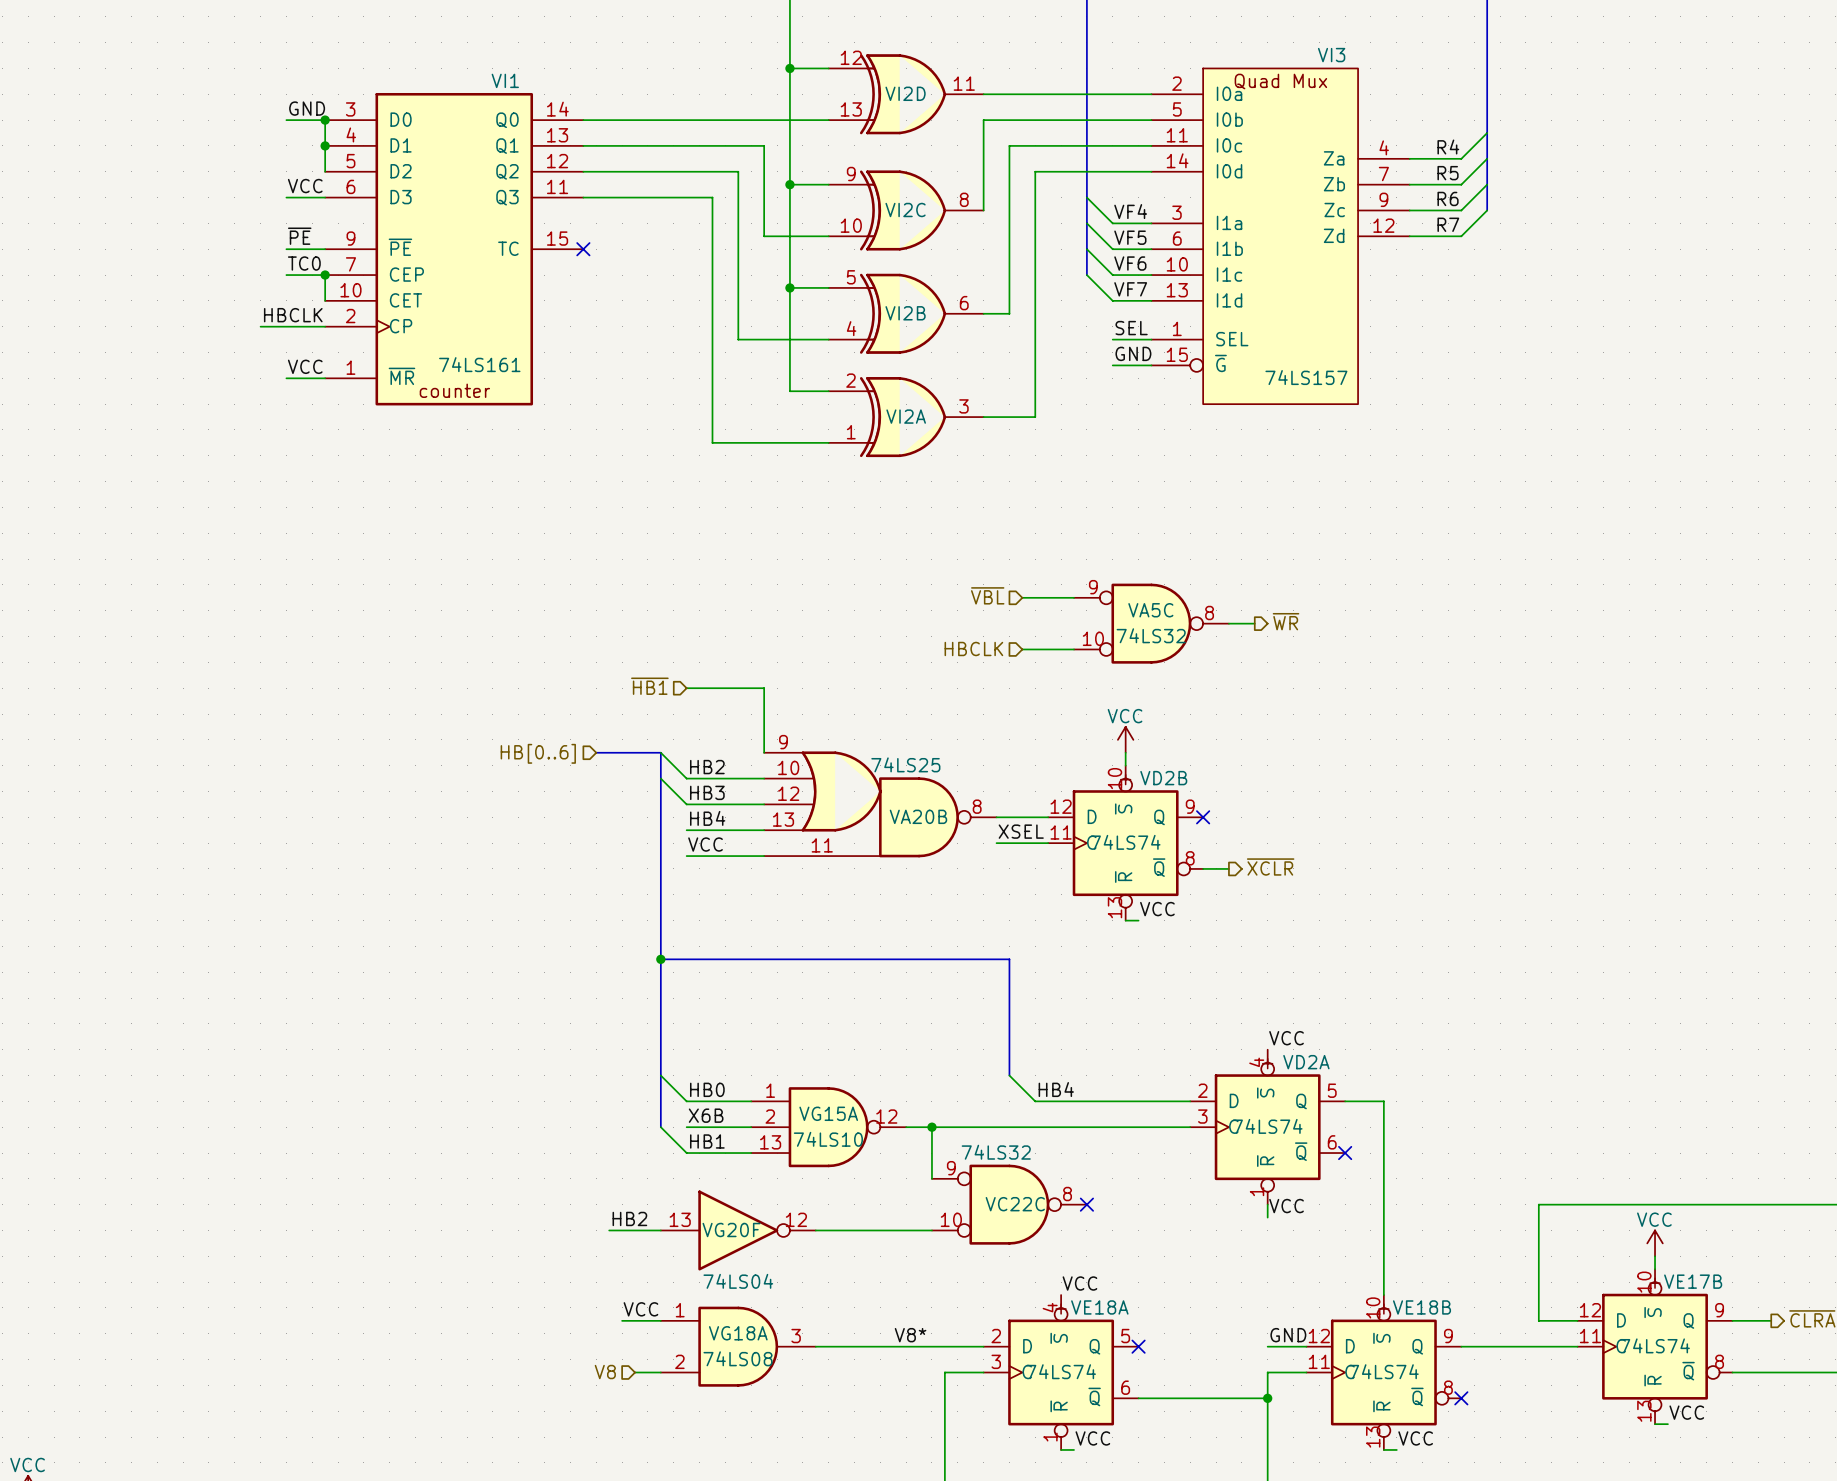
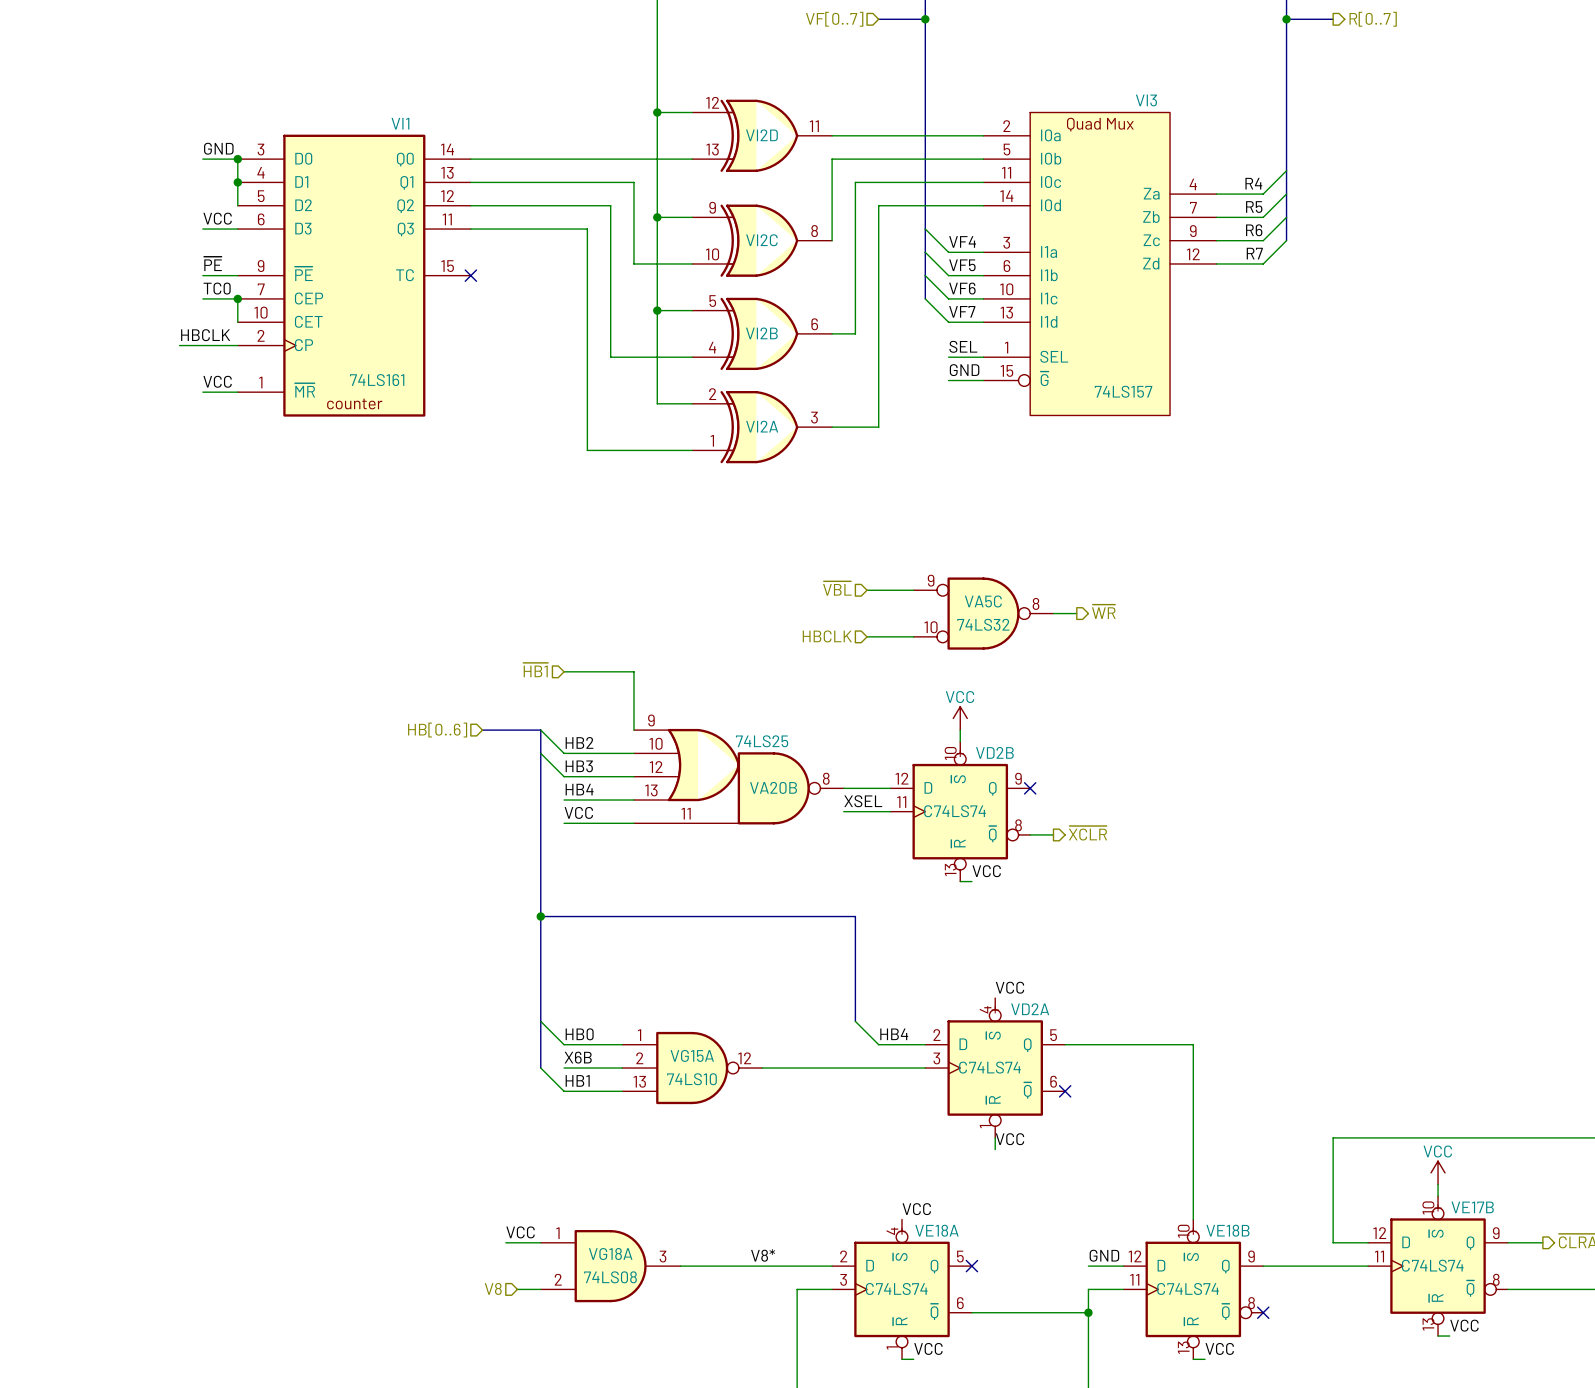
label: none -> VCC (1009, 987)
label: VCC (1286, 1038) -> none
wire: (931, 1127) (931, 1178) -> none
junction: (931, 1127) -> none
VD2A position: (1267, 1127) -> (995, 1068)
no-connect mark: none -> (1065, 1091)
no-connect mark: (1345, 1153) -> none
VC22C: 74LS32 (1009, 1204) -> none
no-connect mark: (1086, 1204) -> none
wire: (1267, 1204) (1267, 1217) -> (995, 1137) (995, 1149)
label: none -> VCC (1009, 1139)
label: VCC (1286, 1206) -> none
label: HB2 (629, 1218) -> none
wire: (609, 1230) (660, 1230) -> none
VG20F: 74LS04 (738, 1230) -> none
wire: (815, 1230) (931, 1230) -> none

